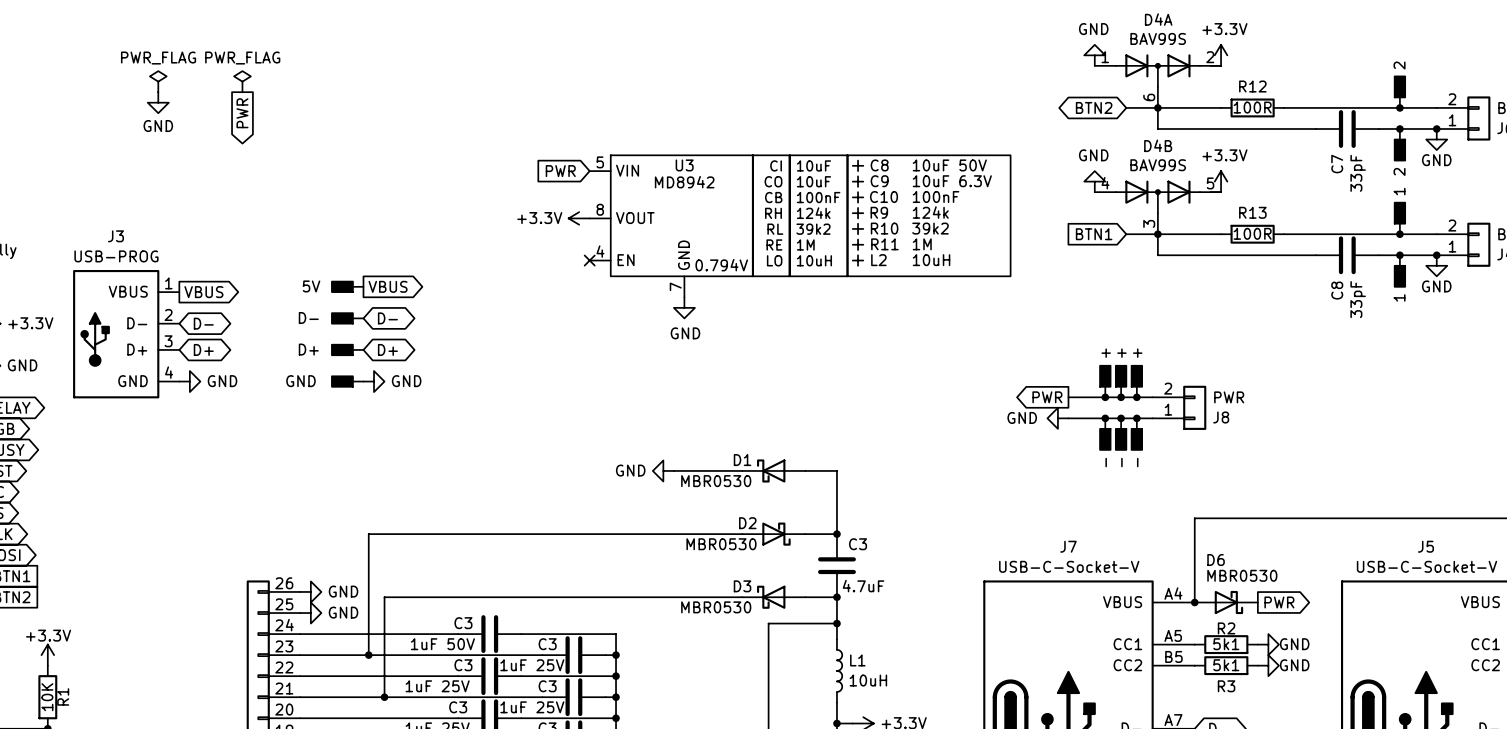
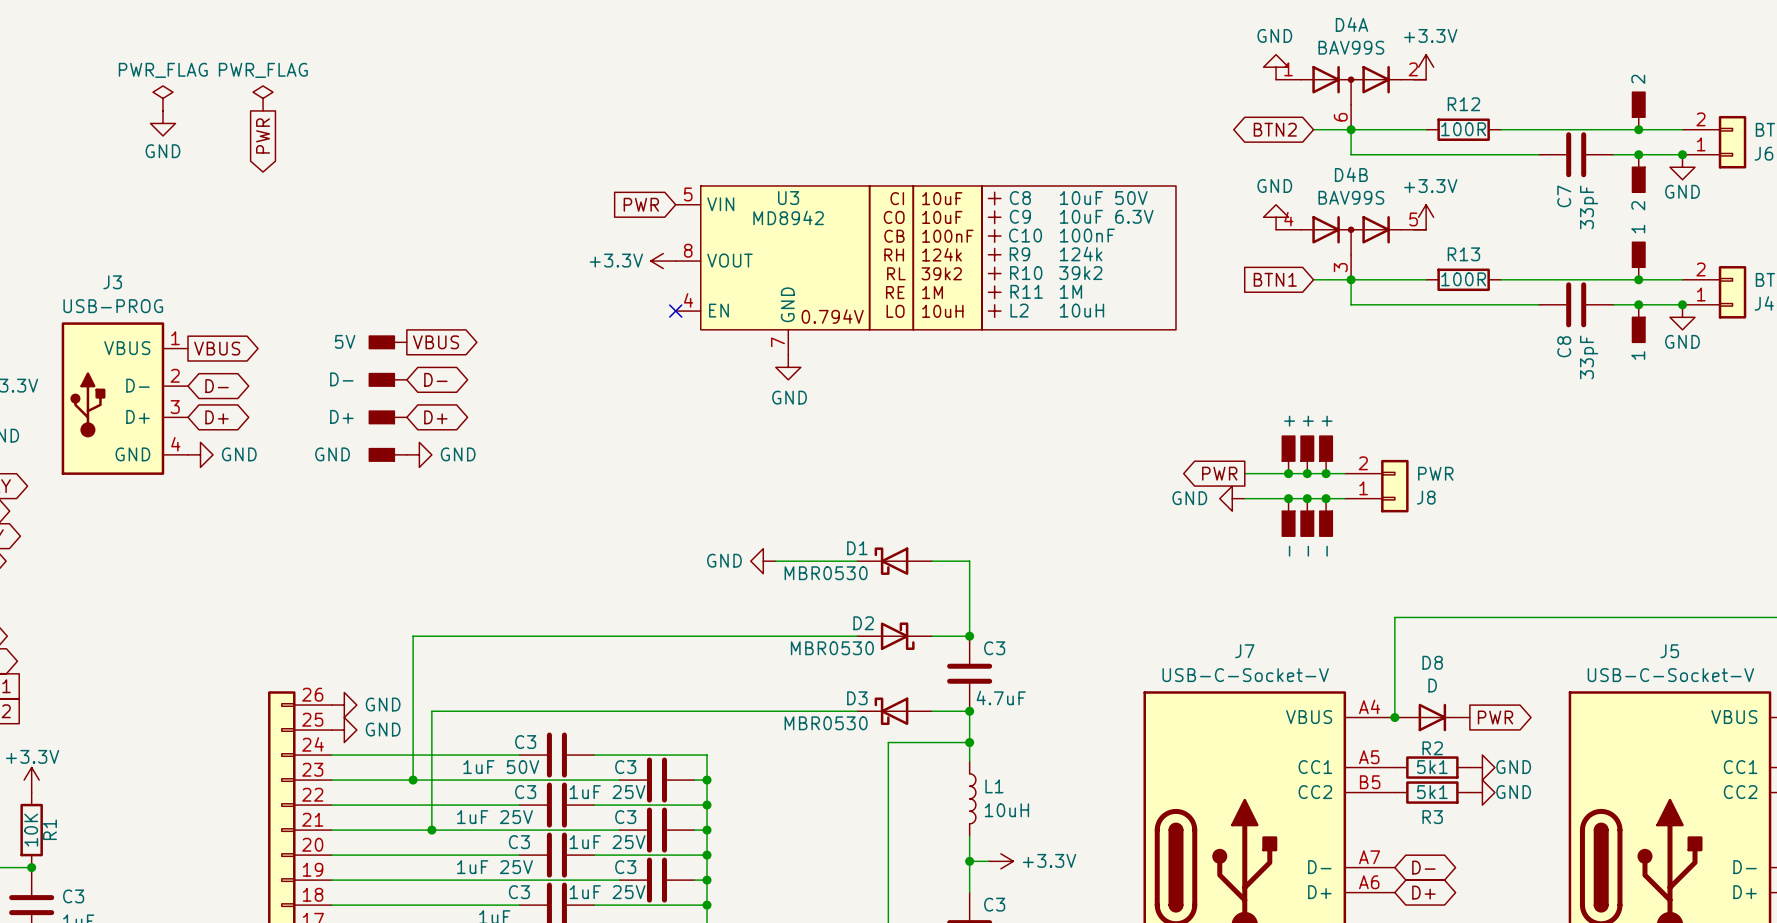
D6: MBR0530 (1226, 602) -> none
D8: none -> D (1432, 717)

